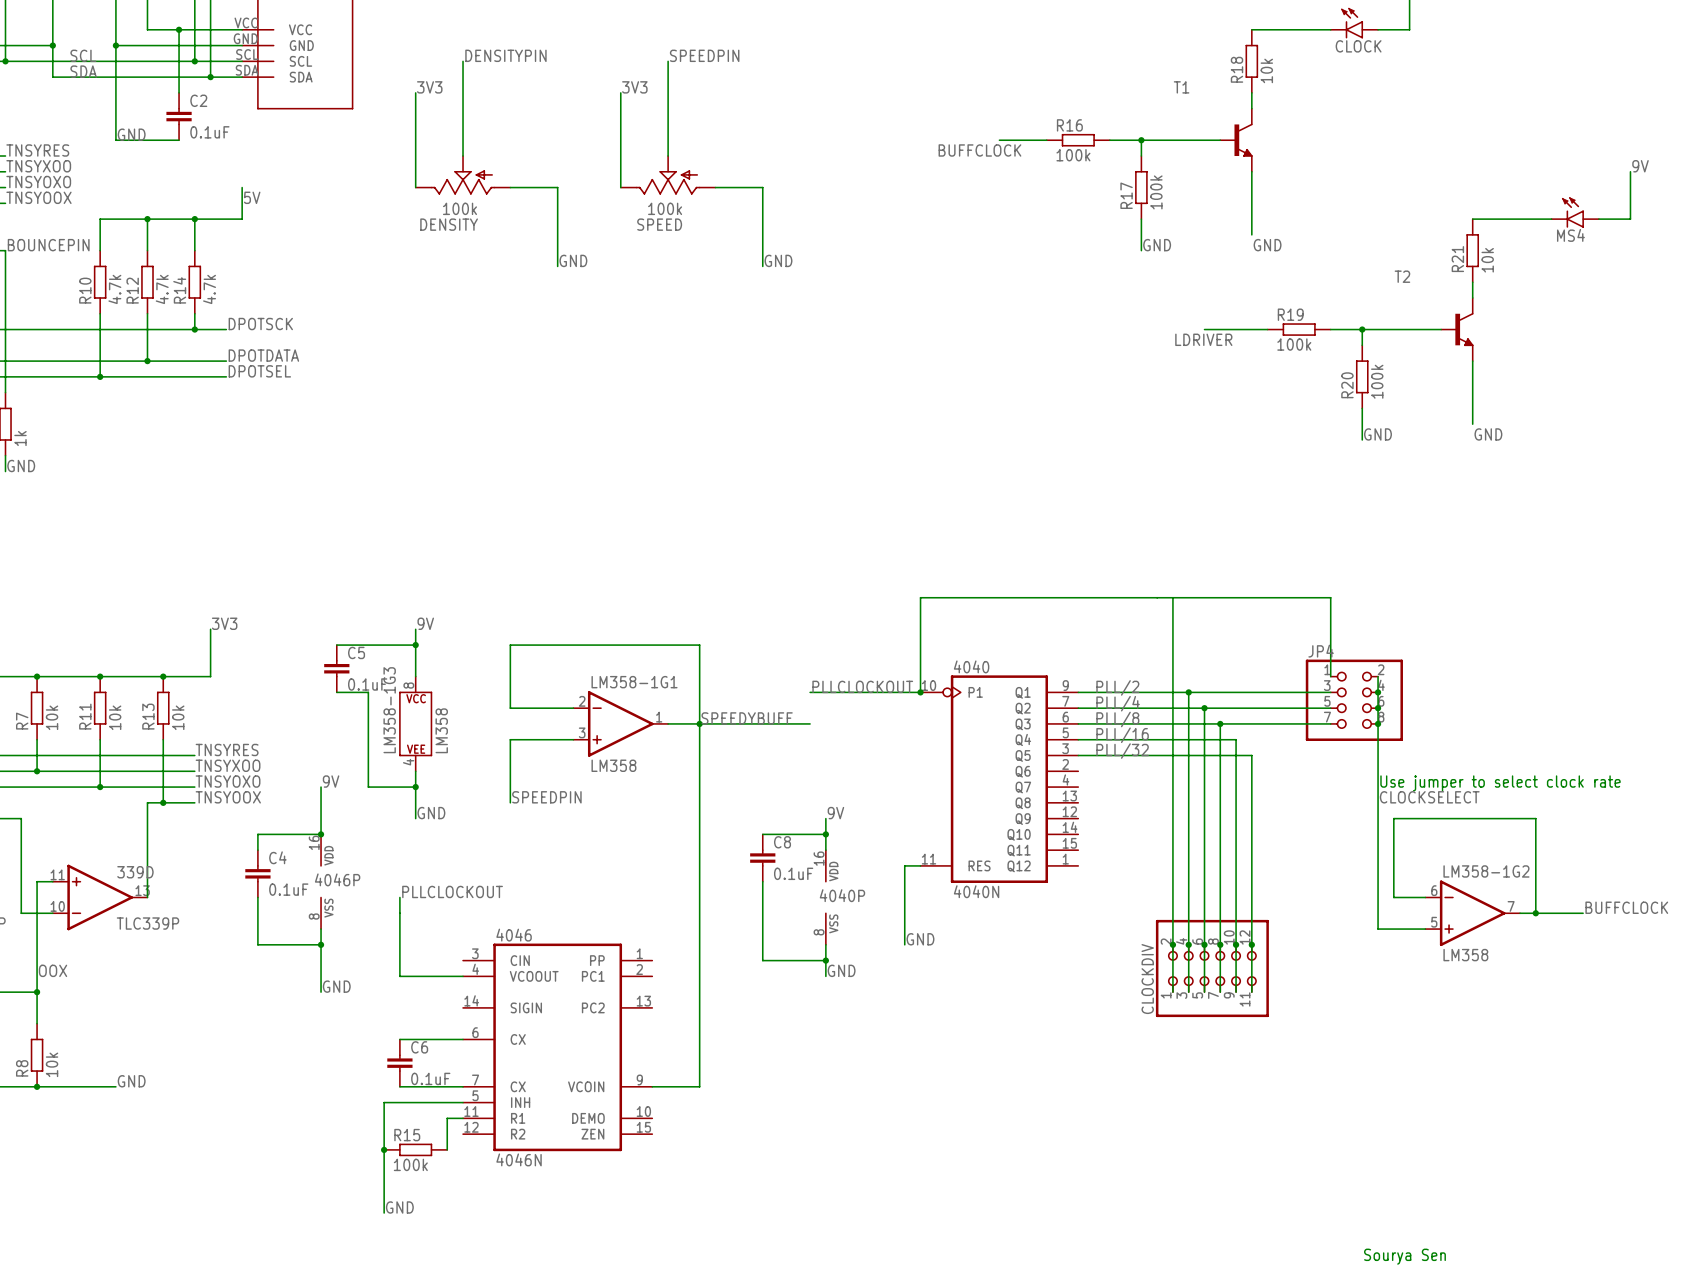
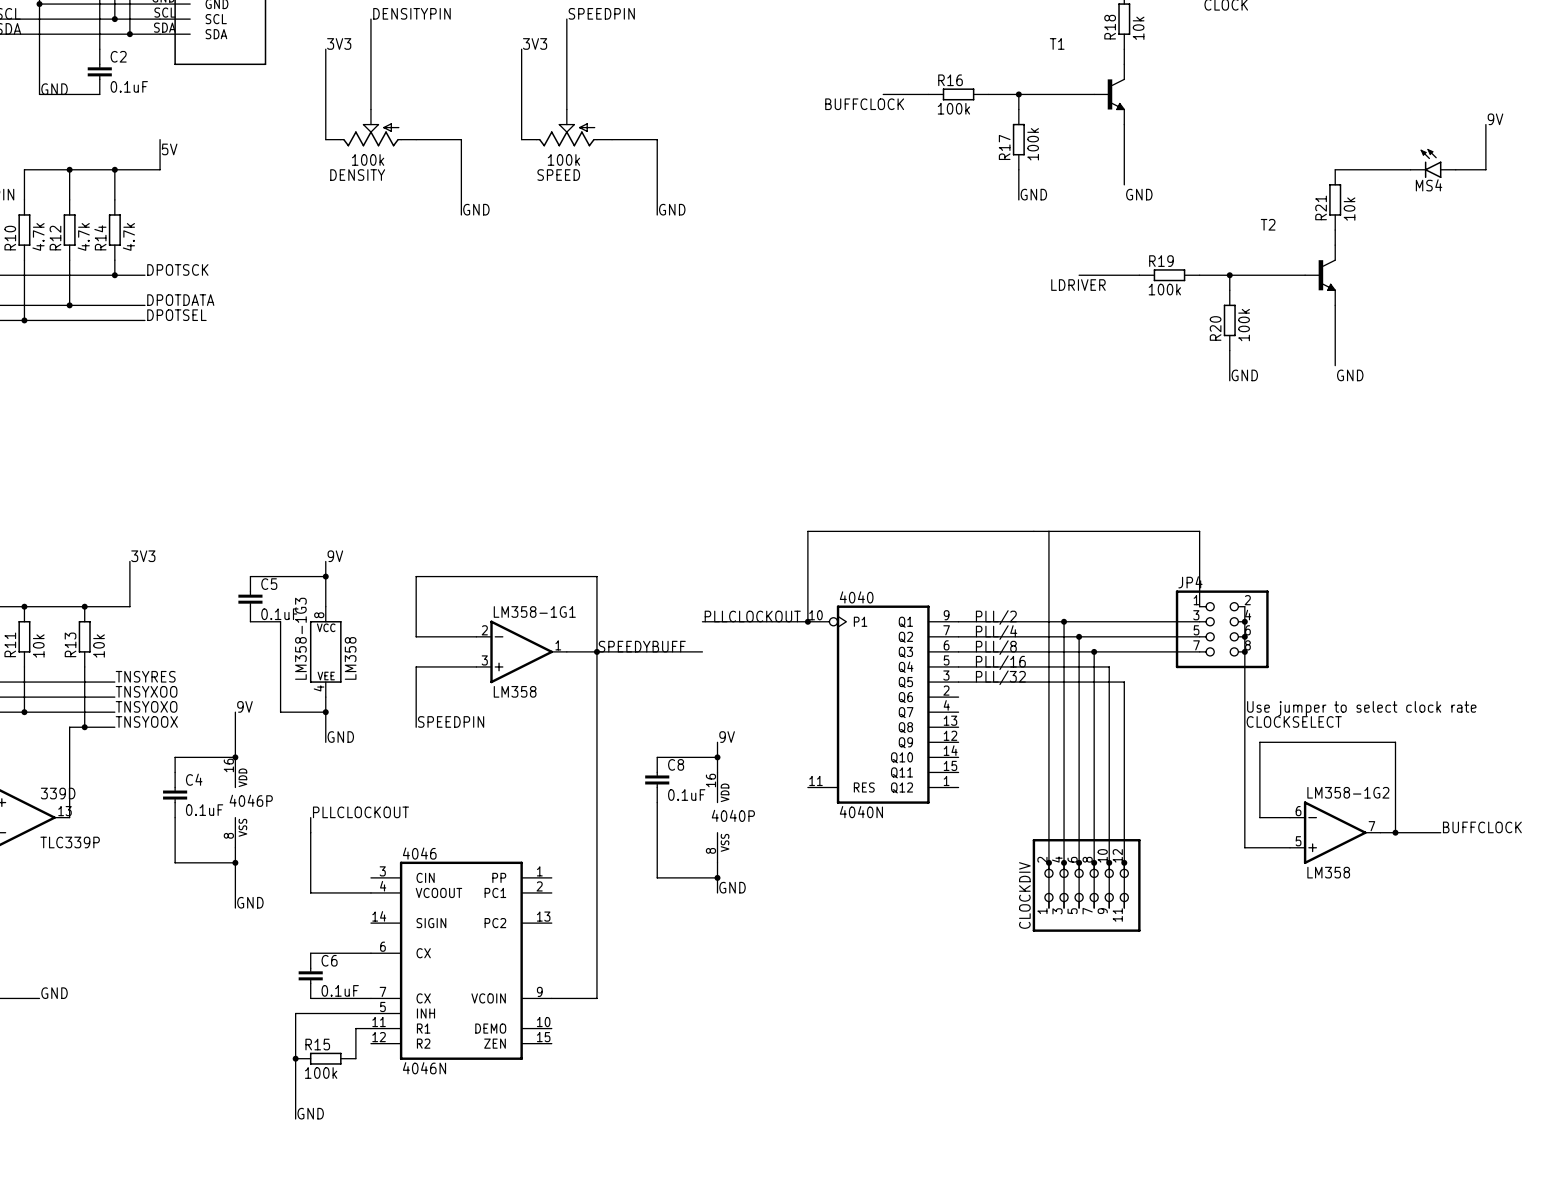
wire: (920, 865) (904, 865) (904, 944) -> none
label: GND (920, 939) -> none
text: Sourya Sen (1404, 1256) -> none

